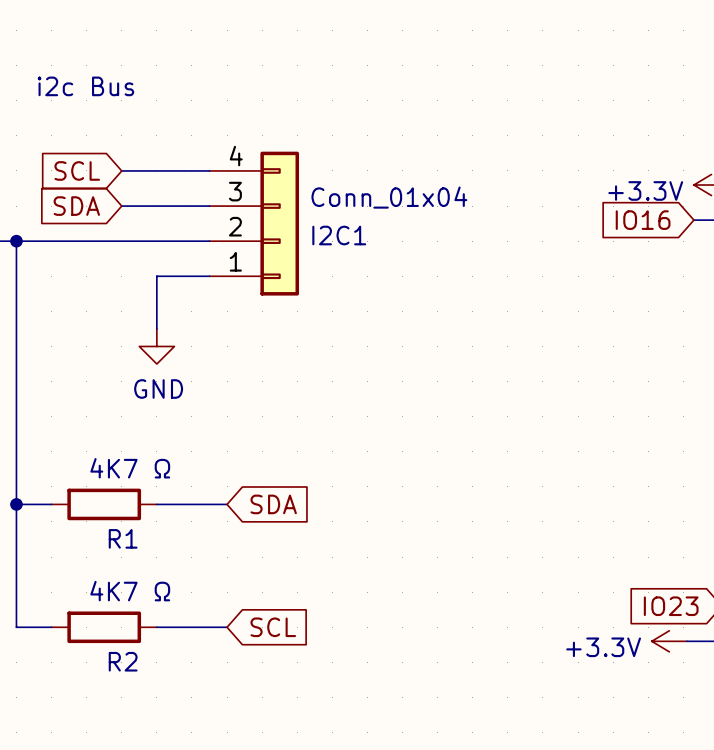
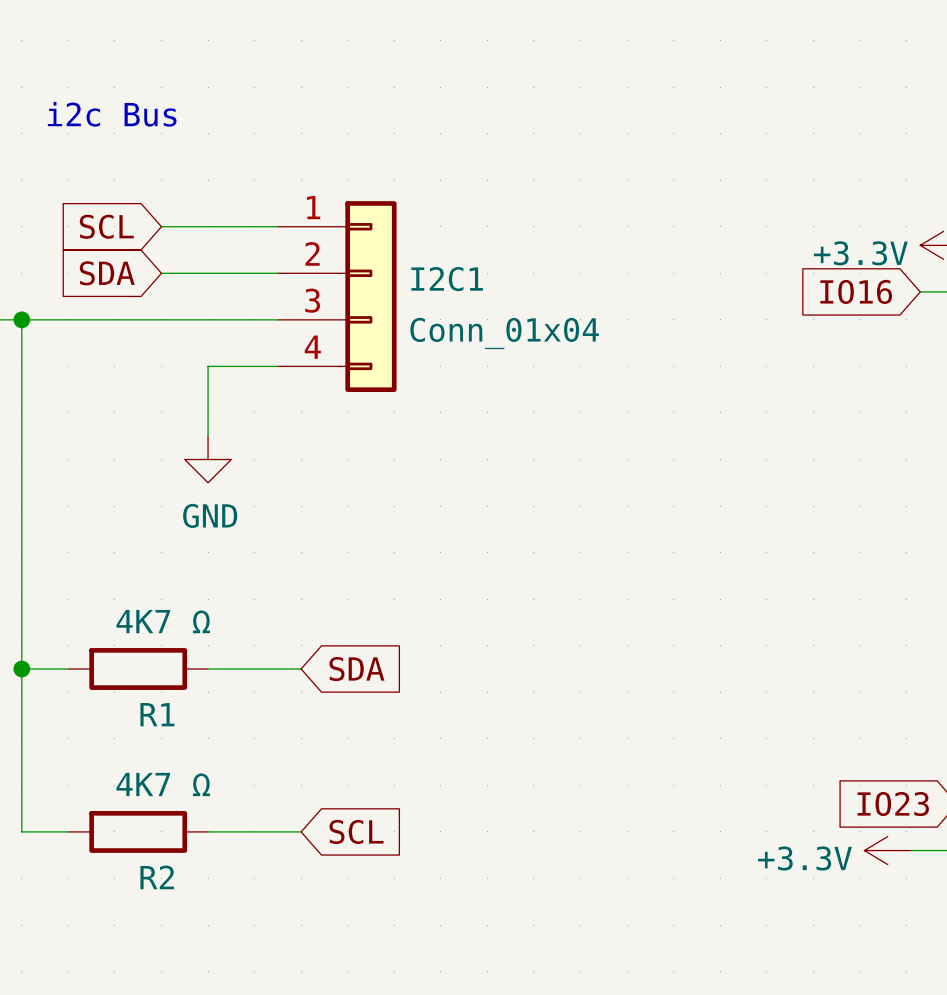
I2C1 flip: as is (279, 223) -> up-down (370, 296)

